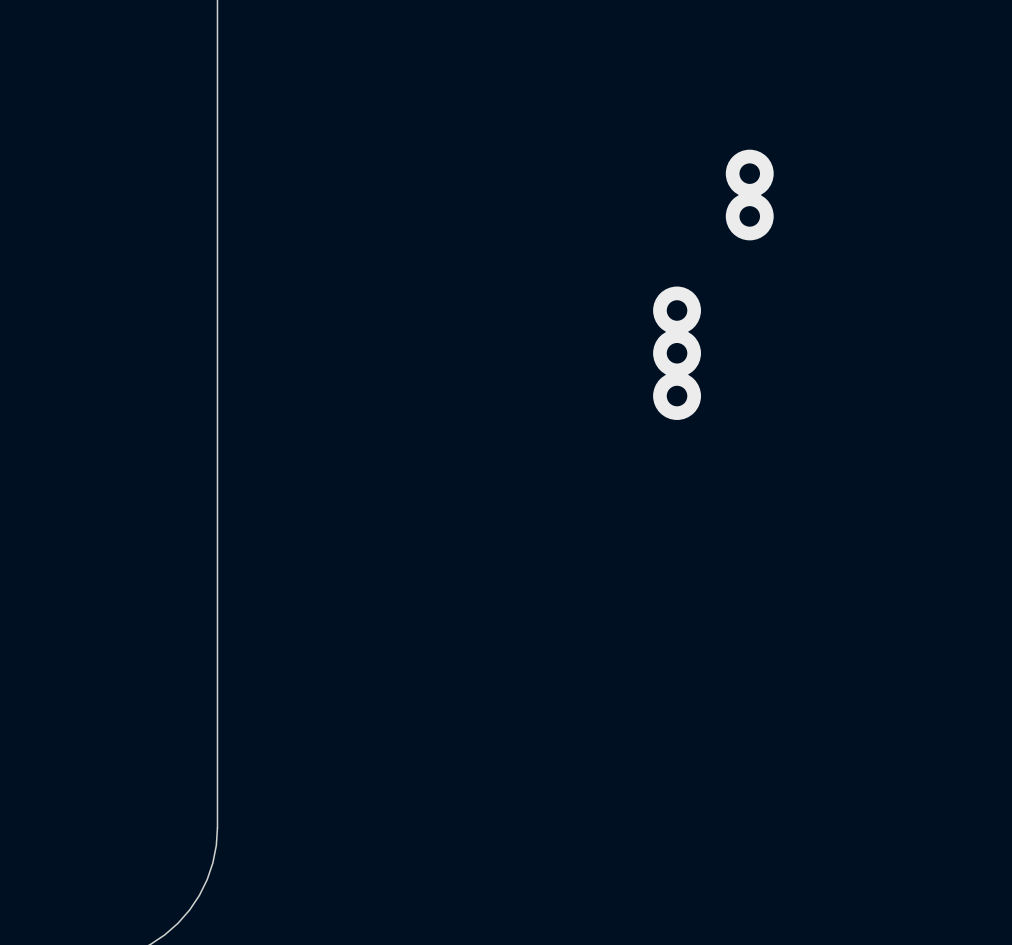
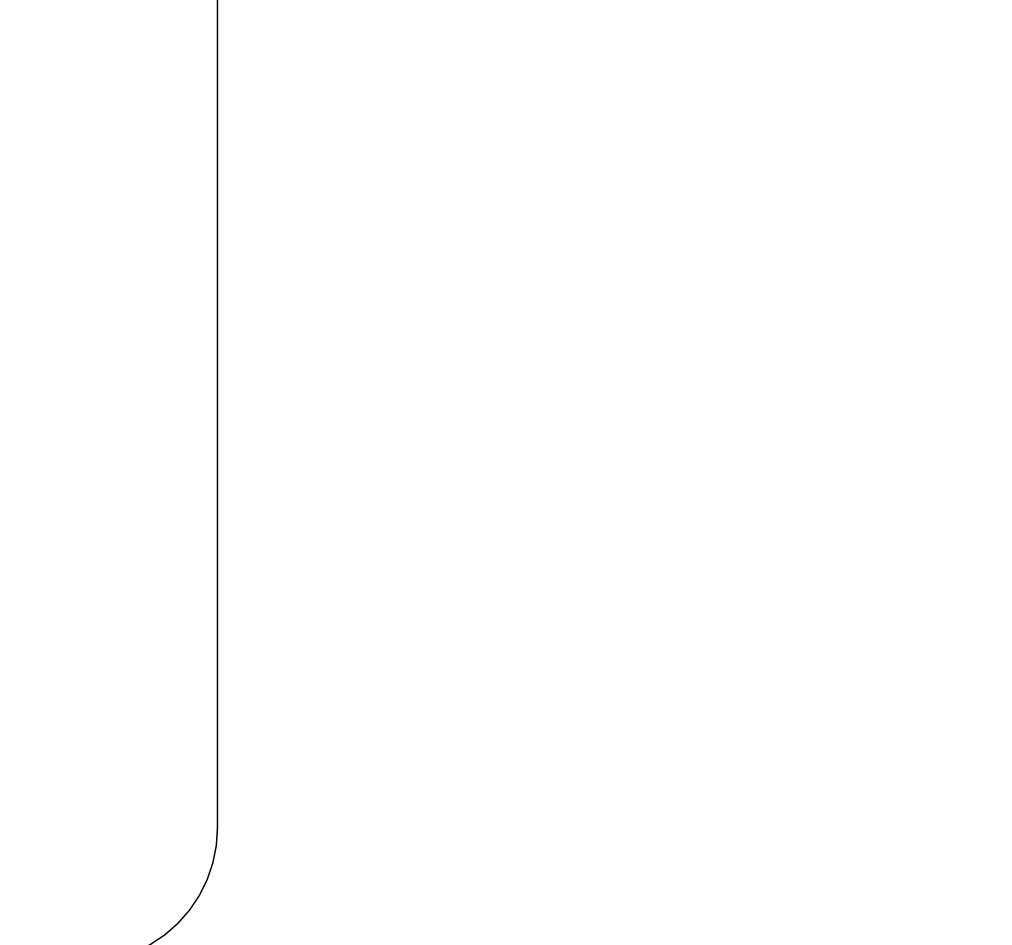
via: (749, 173) -> none
via: (749, 216) -> none
via: (677, 310) -> none
via: (677, 353) -> none
via: (677, 396) -> none

